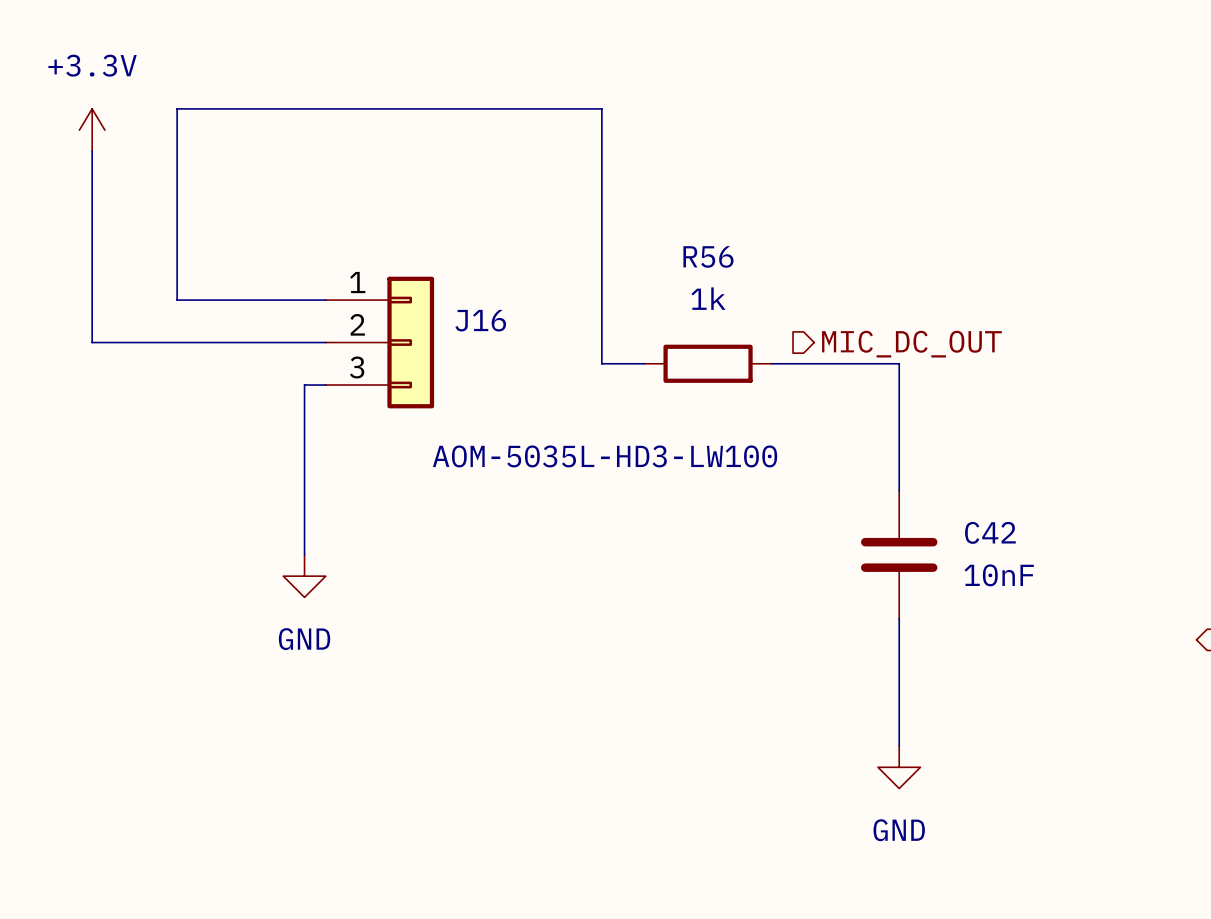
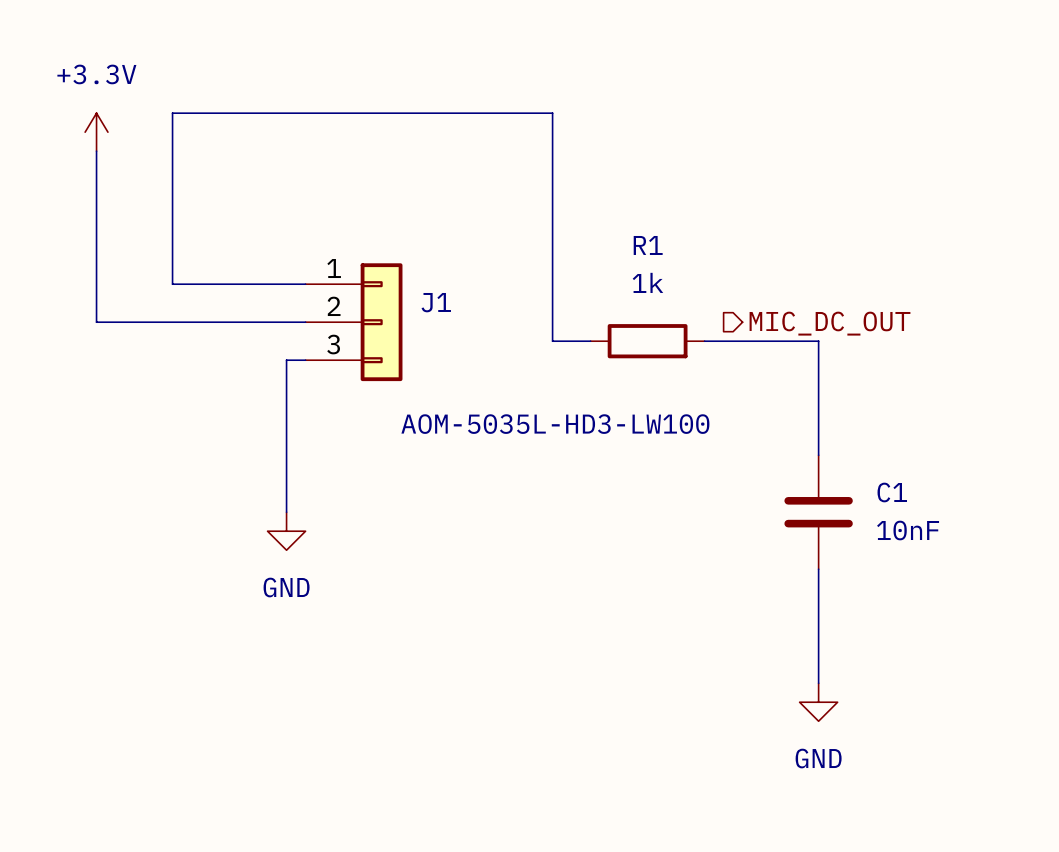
R56 name: R56 (708, 256) -> R1 (648, 245)
J16 name: J16 (480, 320) -> J1 (436, 302)
C42 name: C42 (990, 532) -> C1 (892, 492)

